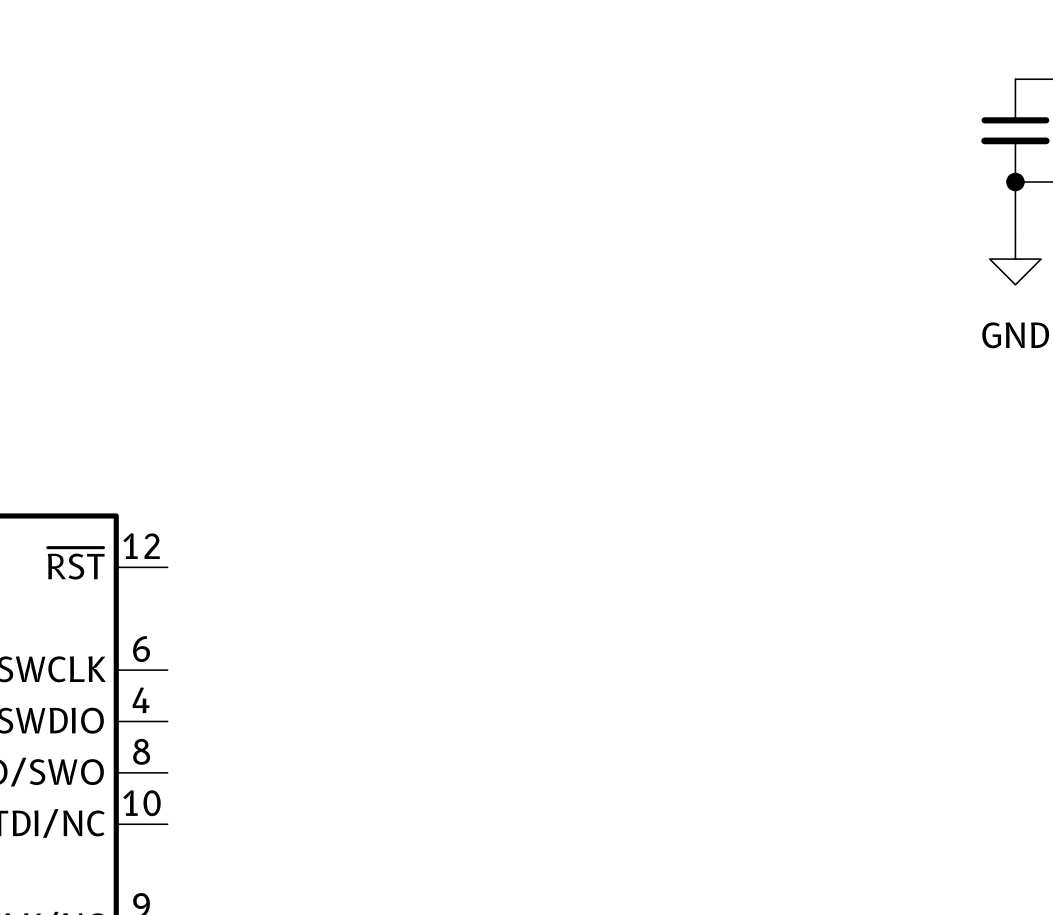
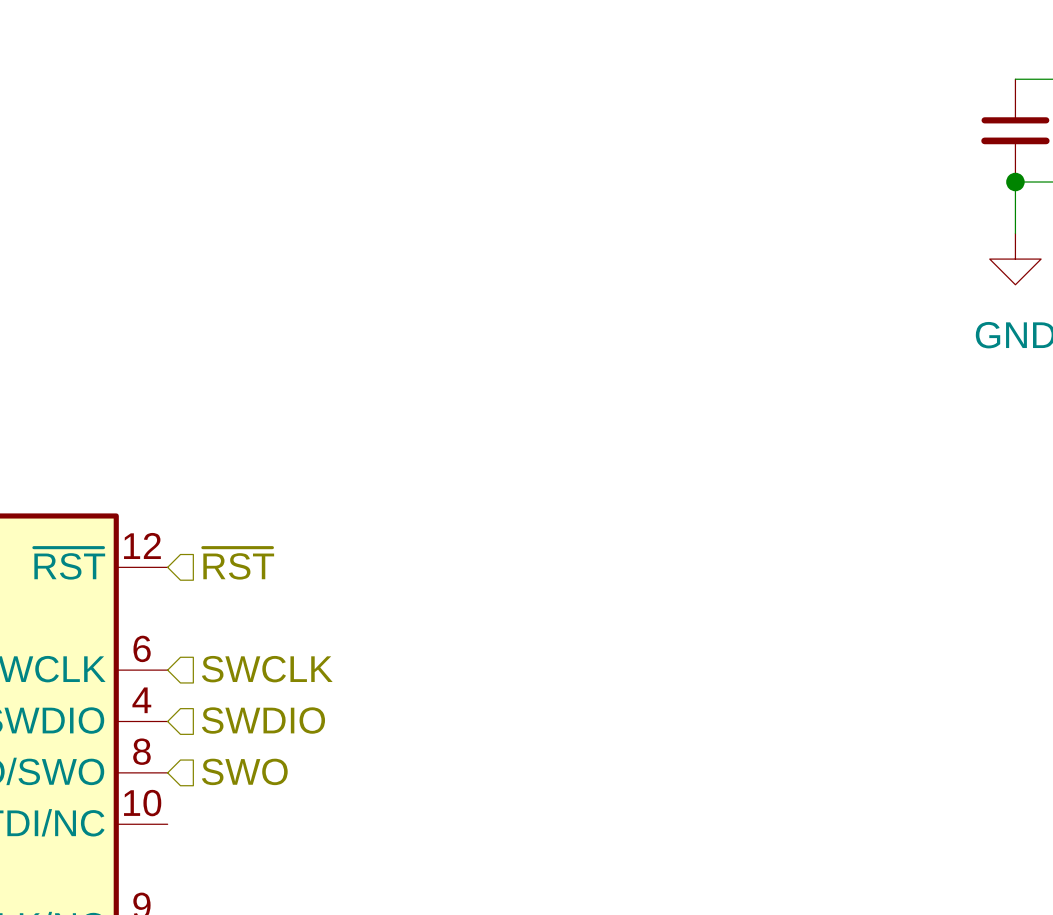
hierarchical label: none -> ~{RST} (238, 563)
hierarchical label: none -> SWCLK (267, 669)
hierarchical label: none -> SWDIO (263, 720)
hierarchical label: none -> SWO (244, 771)

